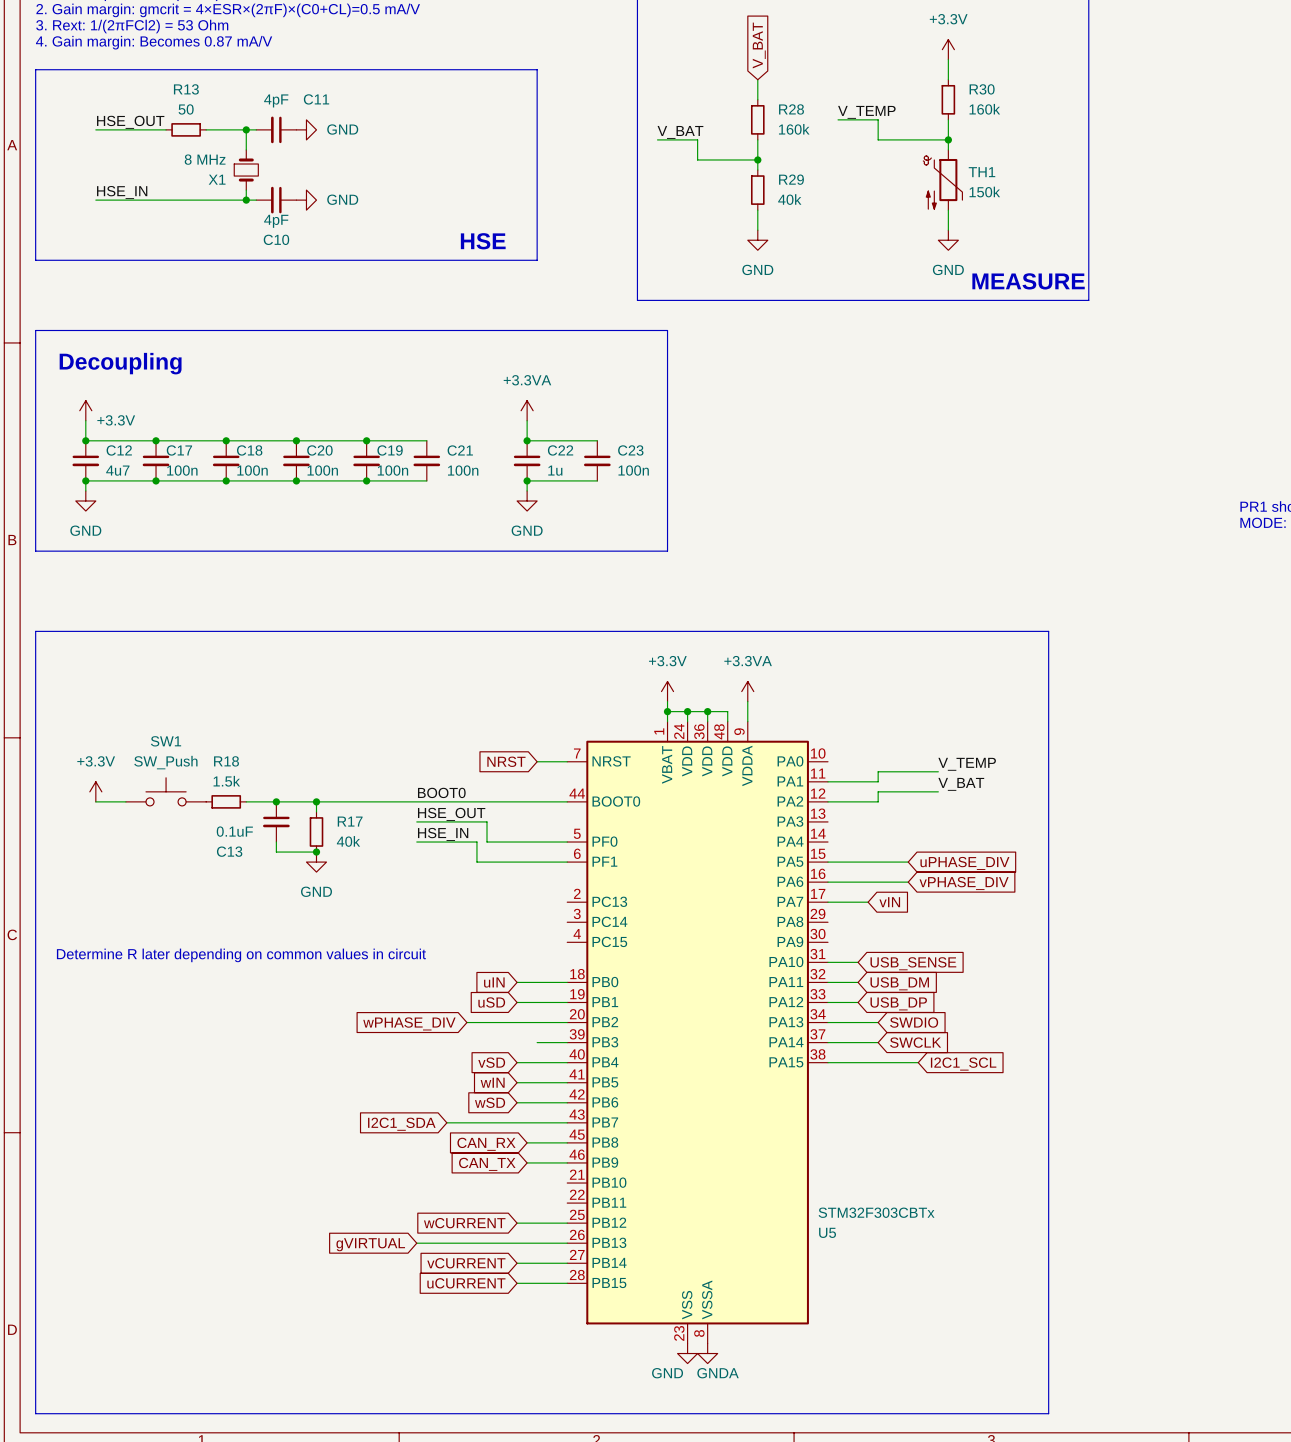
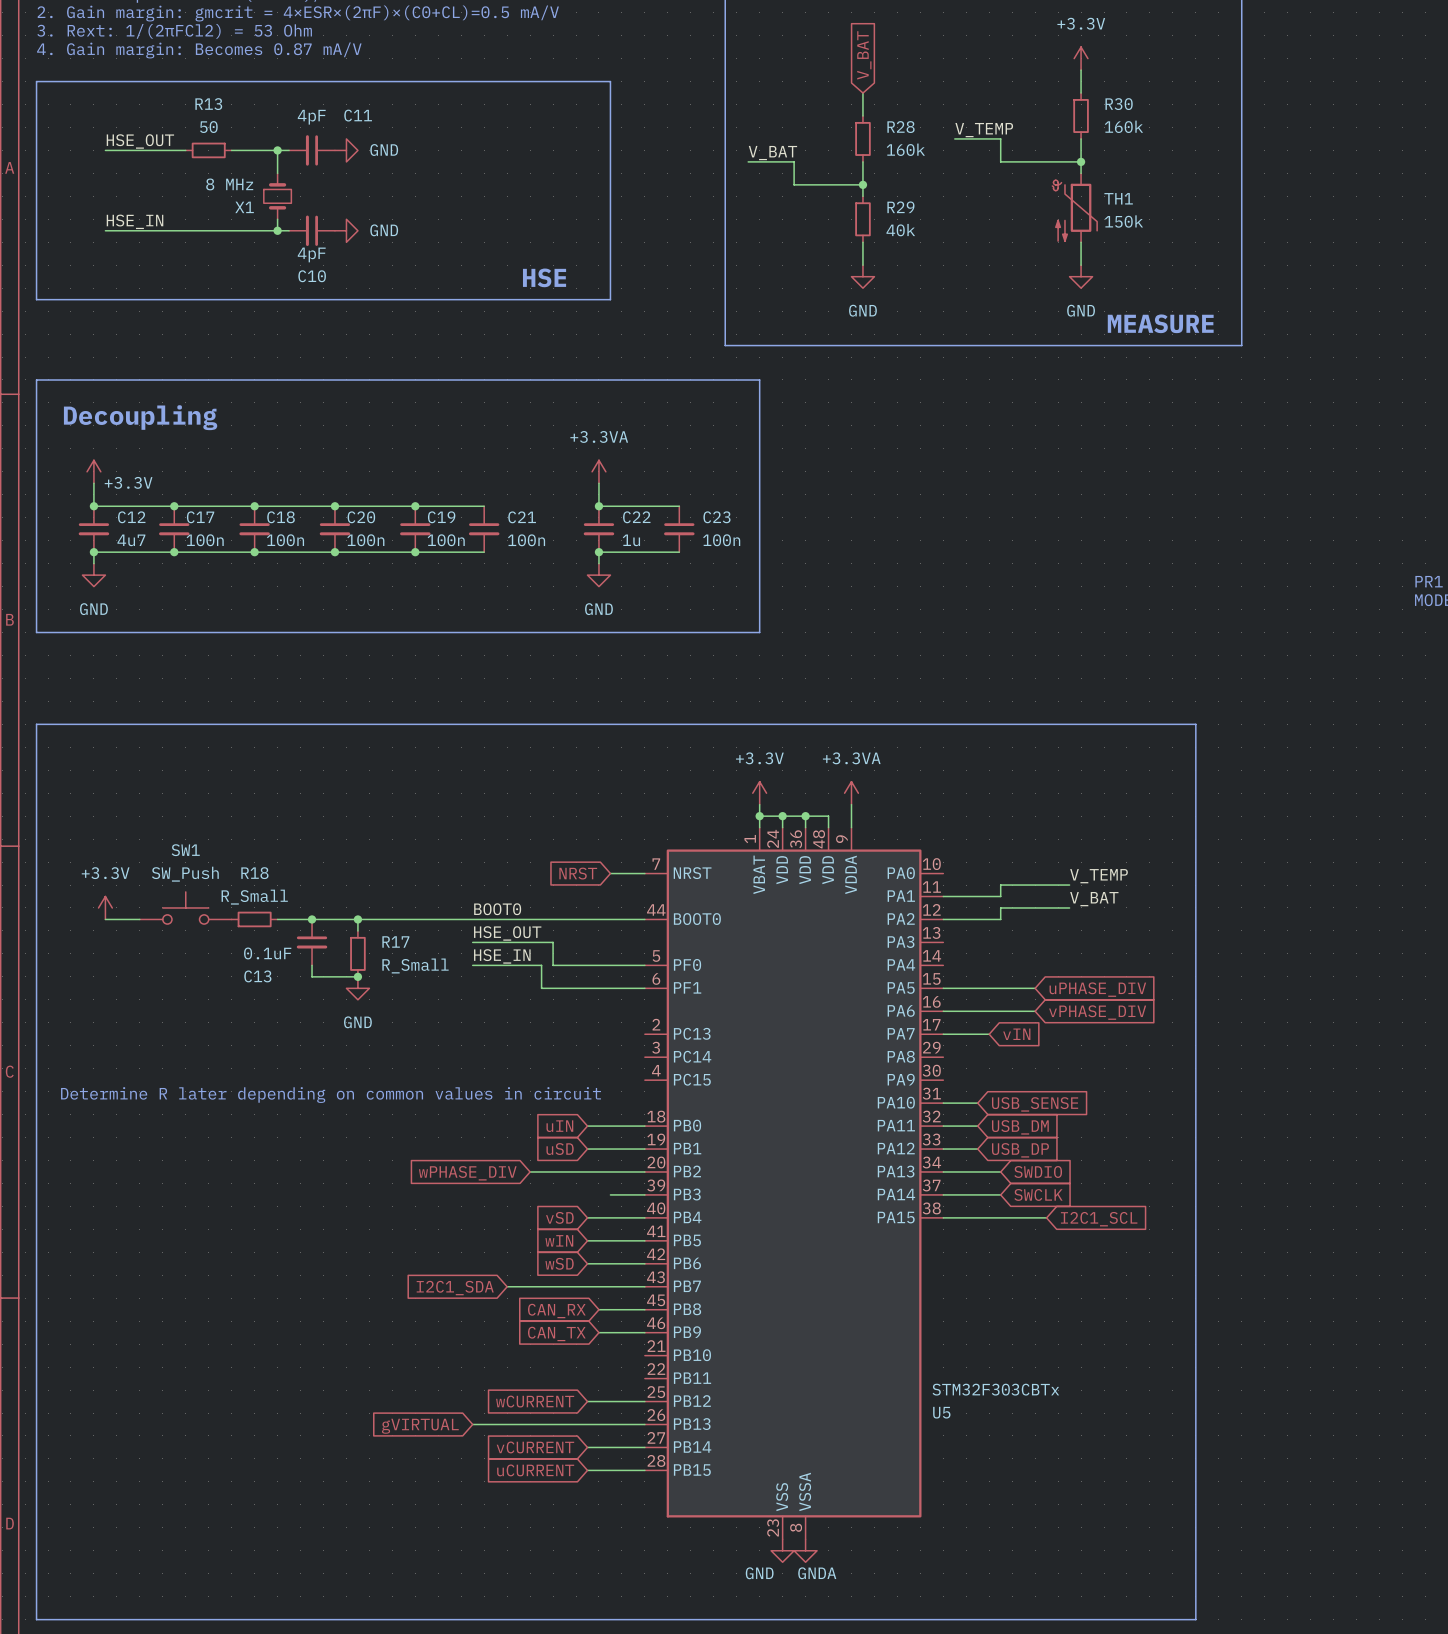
R18 value: 1.5k (226, 781) -> R_Small (254, 897)
R17 value: 40k (348, 841) -> R_Small (415, 965)

